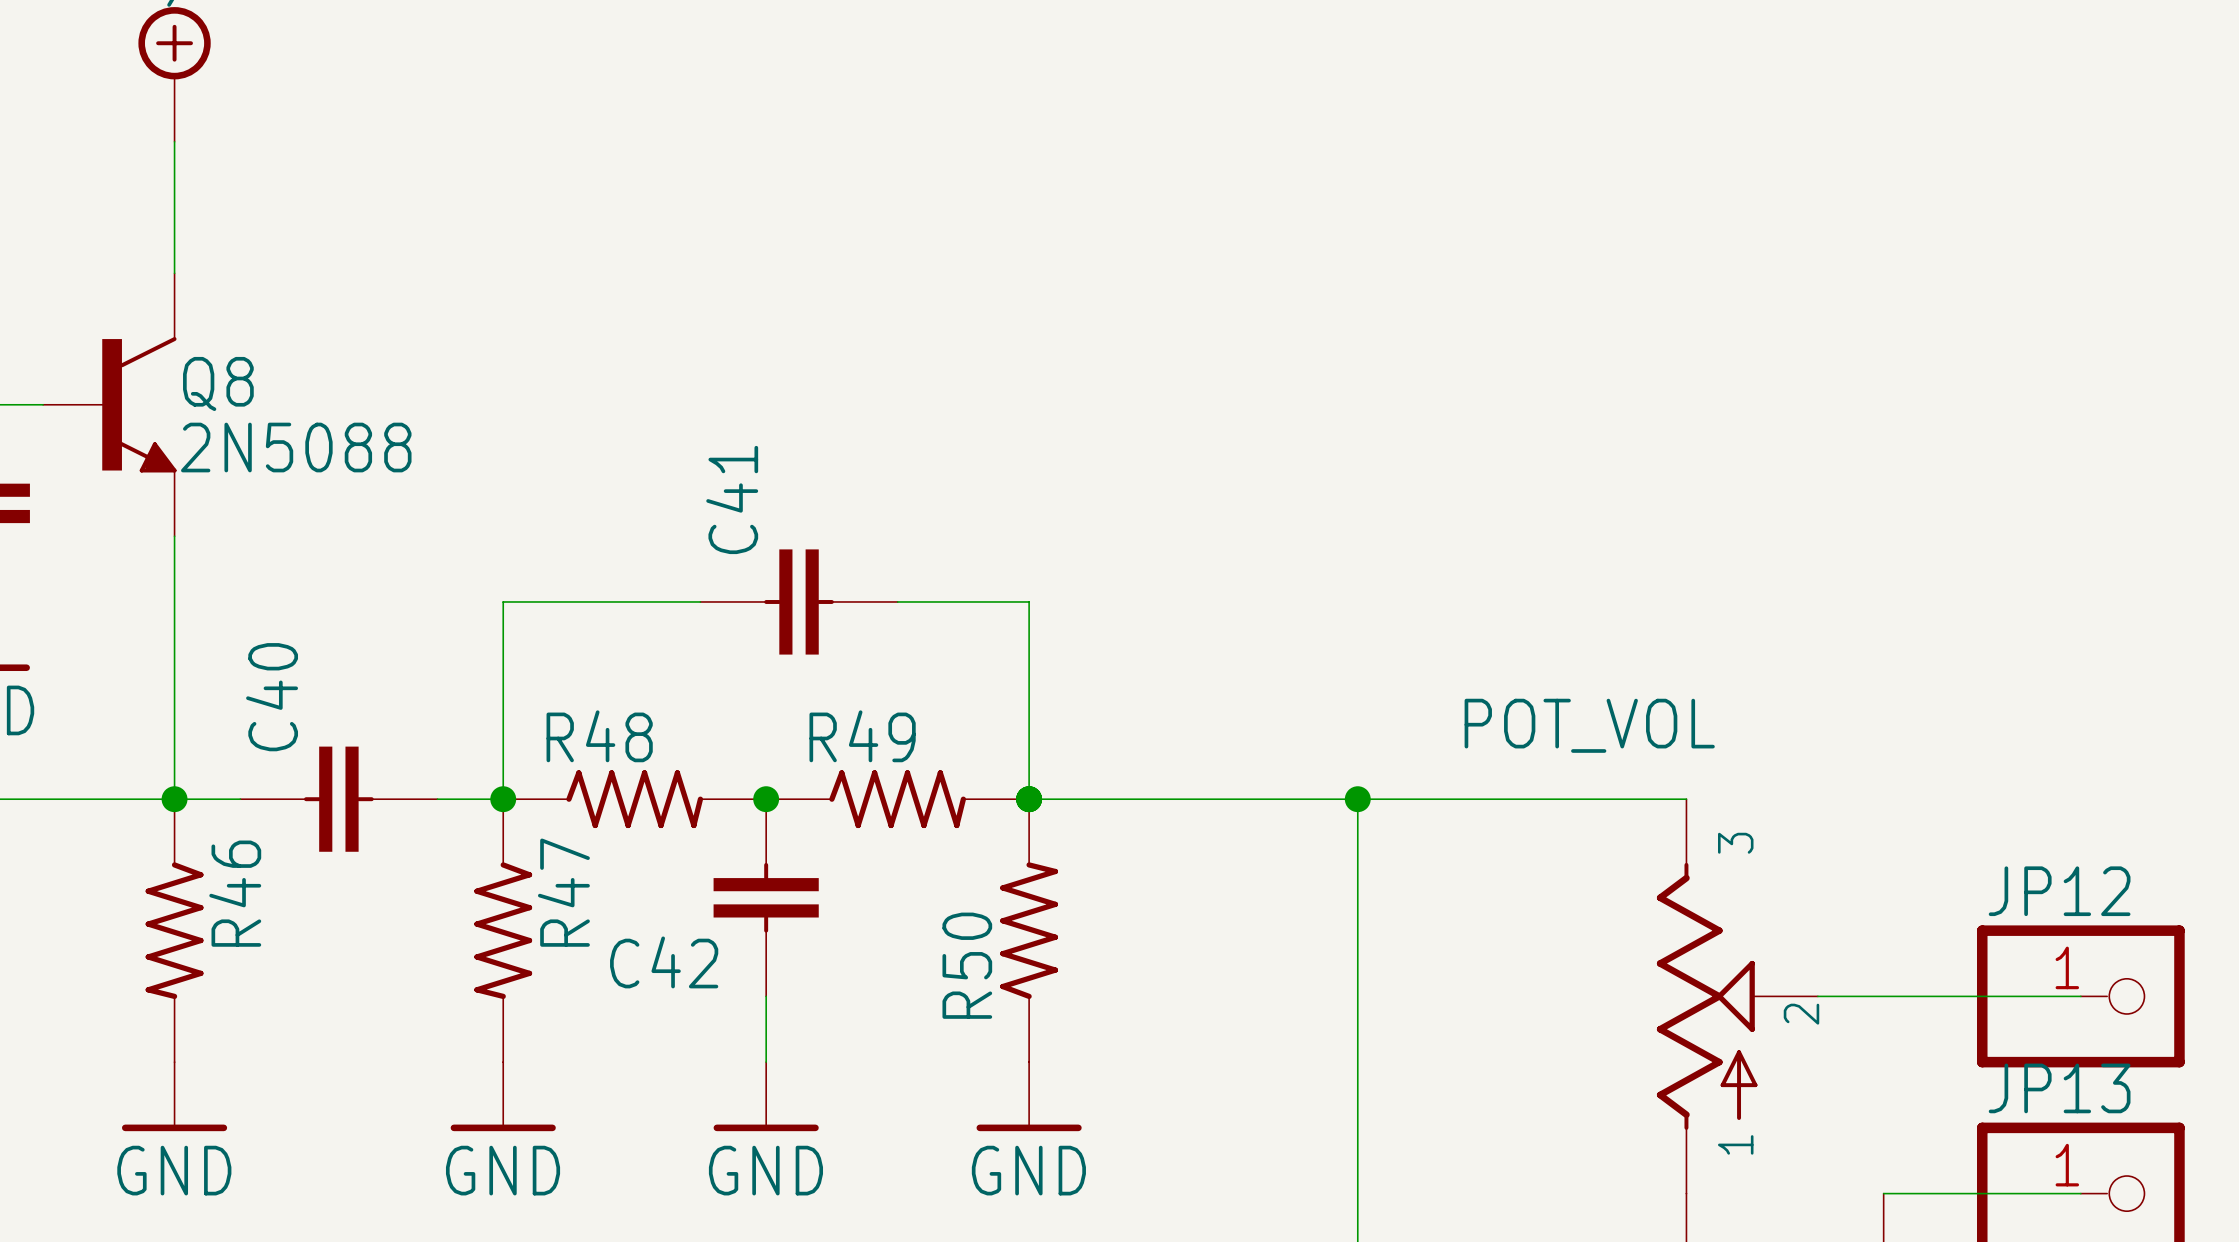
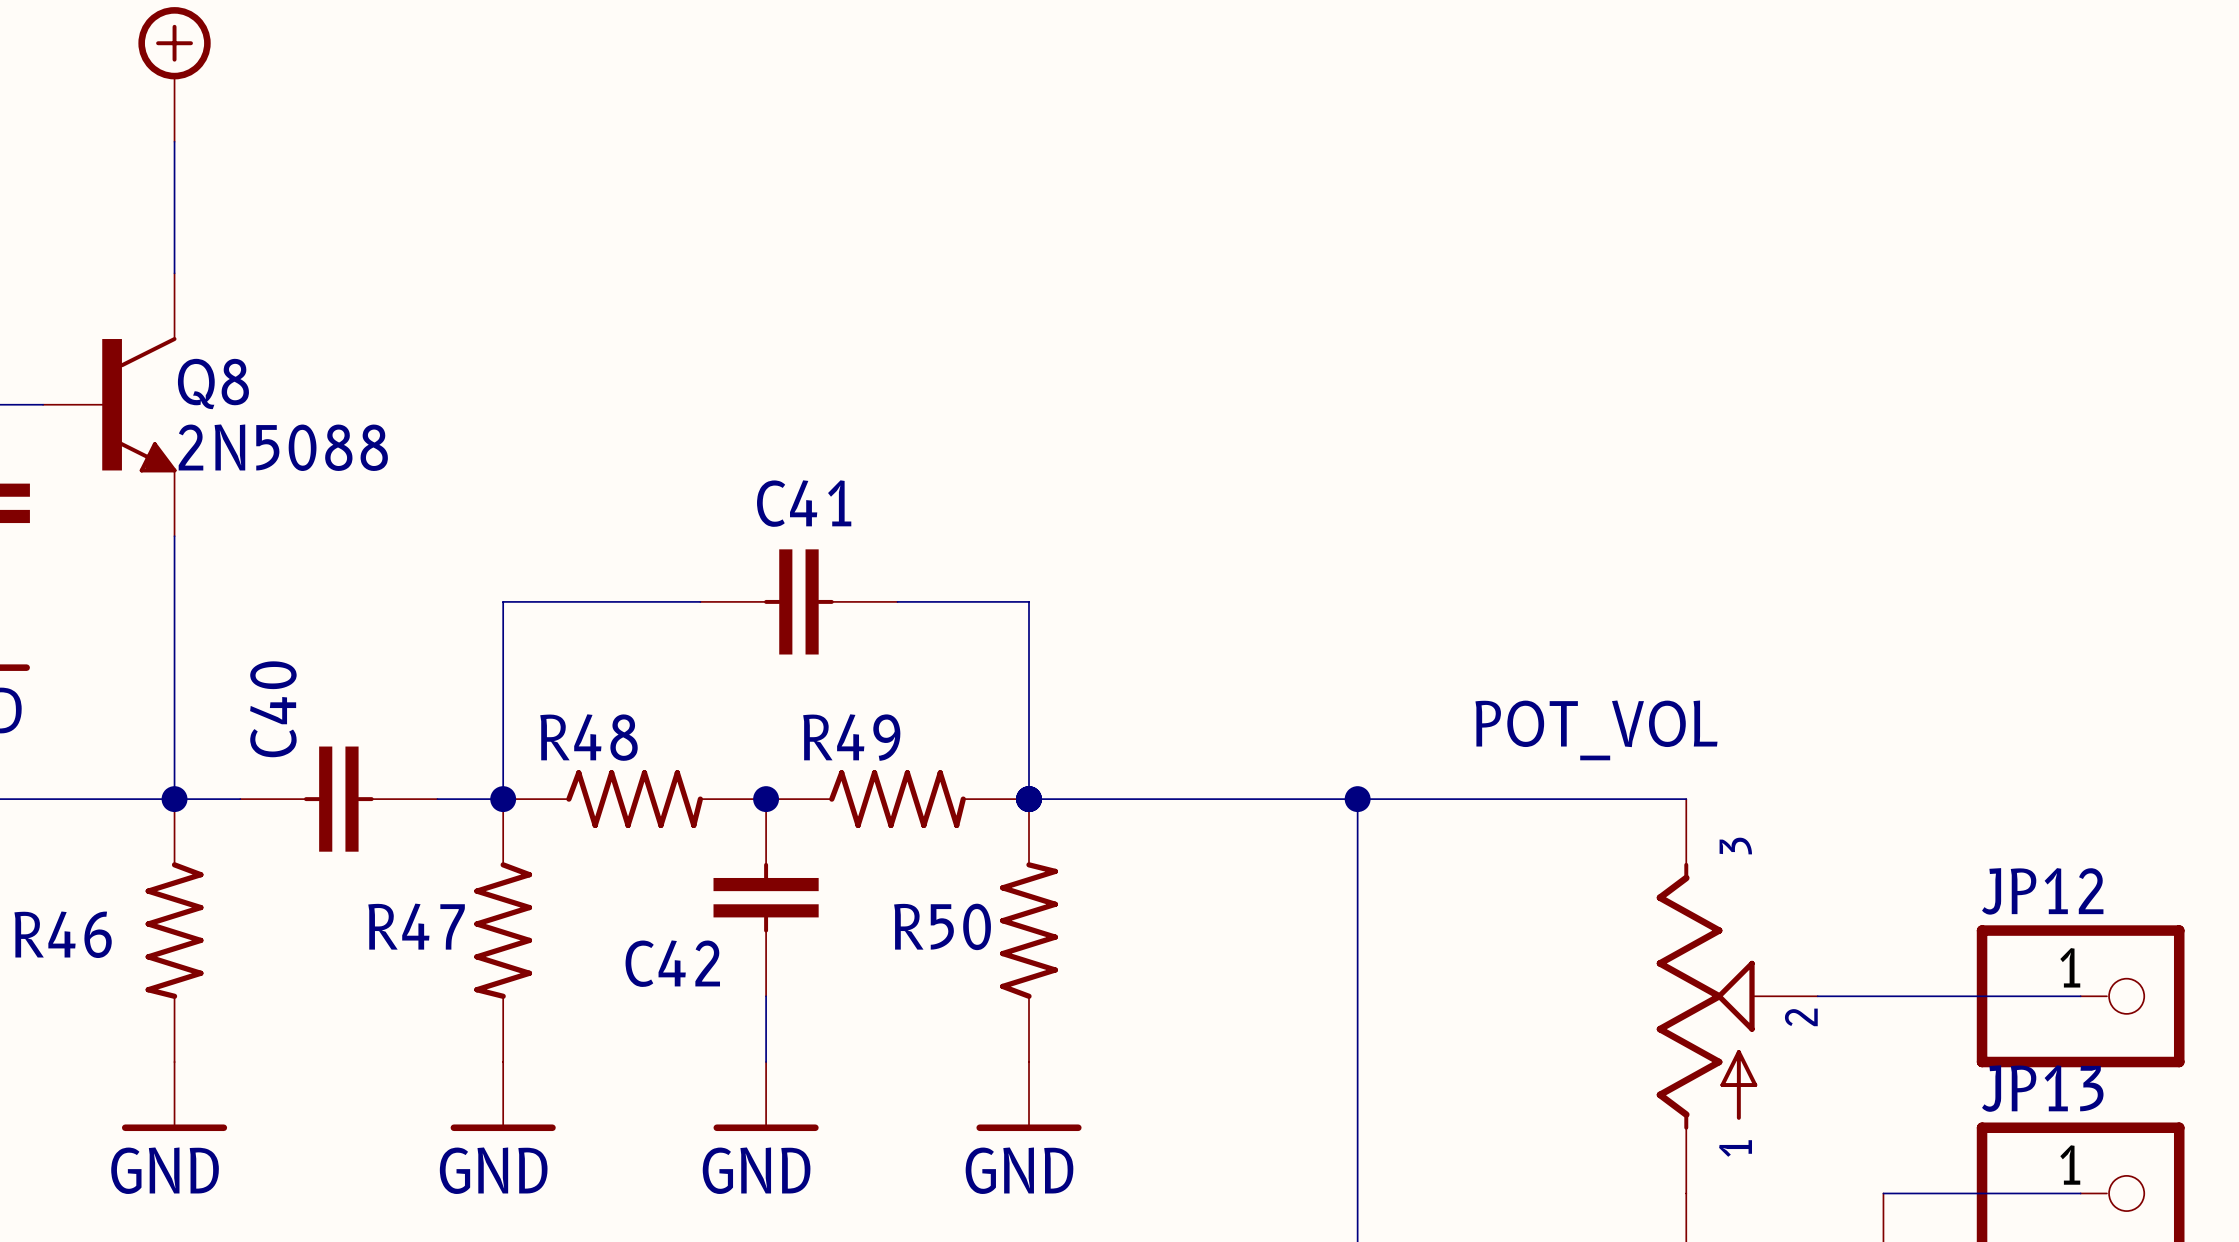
C41 name rotation: 0° (732, 499) -> 90° clockwise (804, 503)
R47 name rotation: 0° (563, 892) -> 90° clockwise (416, 926)
R47 name position: R47 (563, 892) -> R47 (416, 926)
R46 name rotation: 0° (235, 893) -> 90° clockwise (63, 934)
R46 name position: R46 (235, 893) -> R46 (63, 934)
R50 name rotation: 0° (967, 965) -> 90° clockwise (942, 926)

